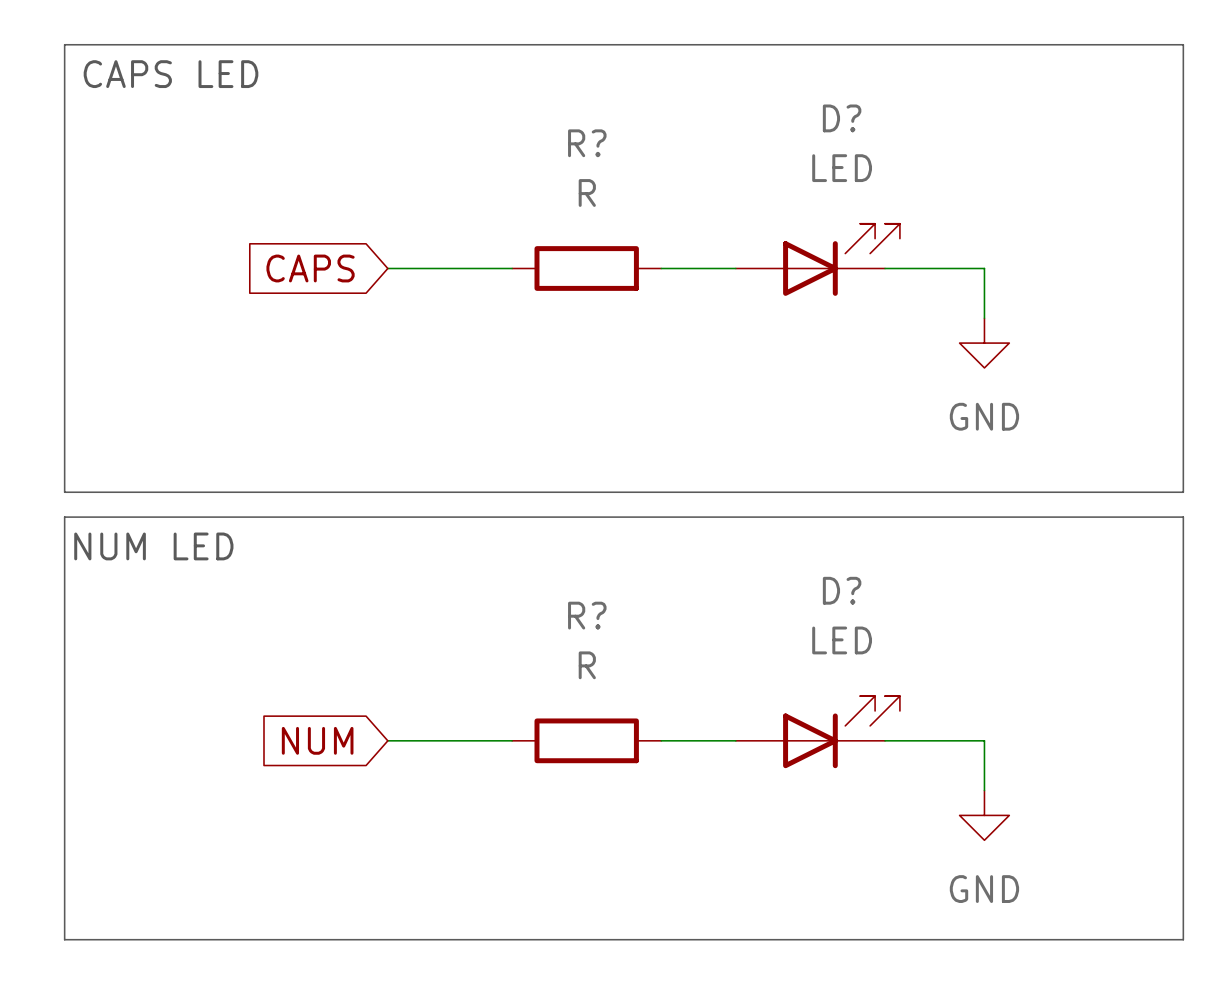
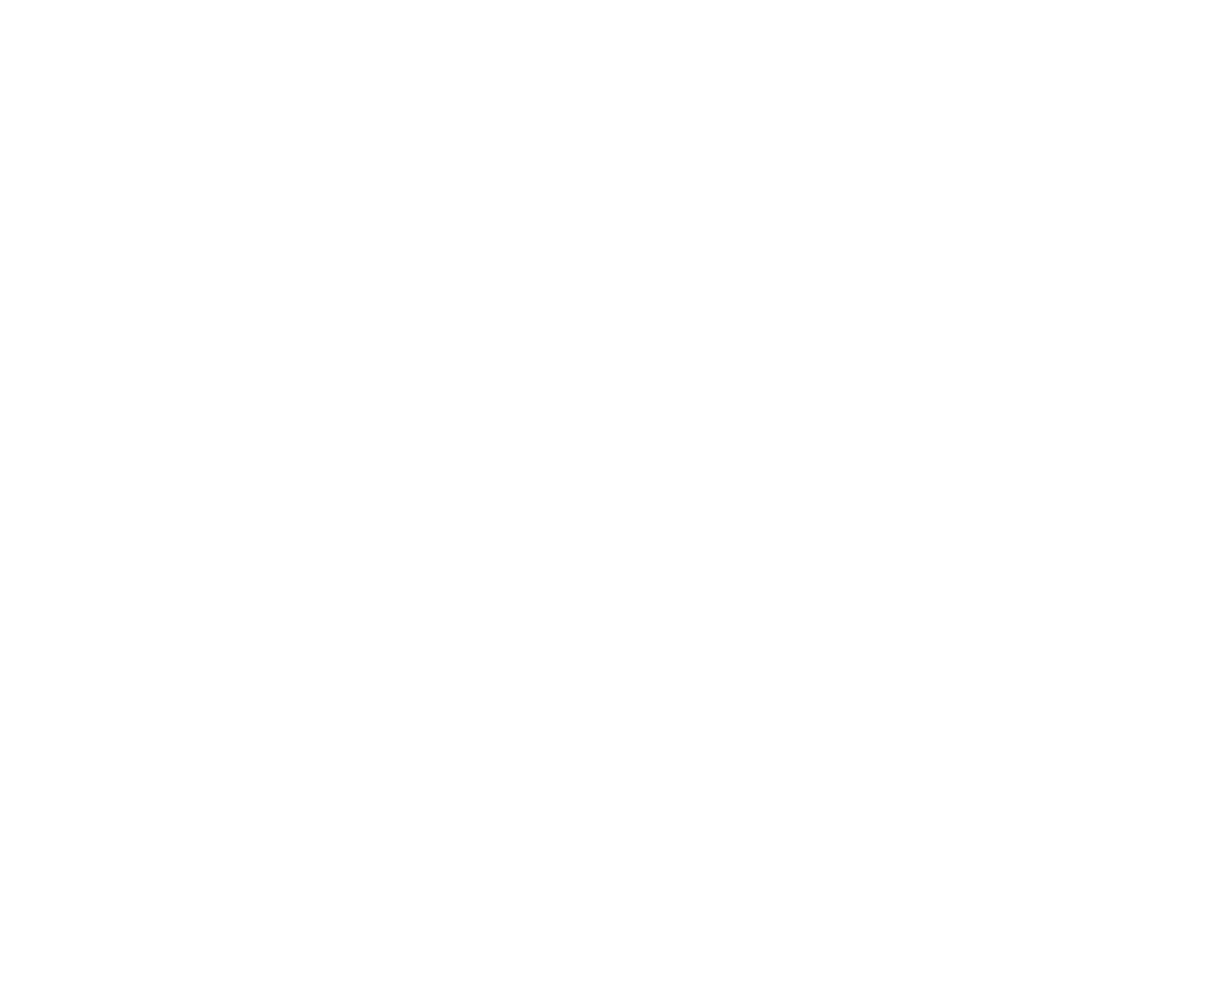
line: (64, 44) (64, 492) (1183, 492) (1183, 44) (64, 44) -> none
text: CAPS LED (171, 74) -> none
D?: LED (817, 259) -> none
global label: CAPS (310, 268) -> none
wire: (387, 268) (512, 268) -> none
R?: R (586, 268) -> none
wire: (661, 268) (735, 268) -> none
wire: (885, 268) (984, 268) (984, 318) -> none
power symbol: GND (984, 343) -> none
line: (64, 517) (64, 939) (1183, 939) (1183, 517) (64, 517) -> none
text: NUM LED (153, 546) -> none
D?: LED (817, 732) -> none
global label: NUM (317, 740) -> none
wire: (387, 740) (512, 740) -> none
R?: R (586, 740) -> none
wire: (661, 740) (735, 740) -> none
wire: (885, 740) (984, 740) (984, 790) -> none
power symbol: GND (984, 815) -> none

